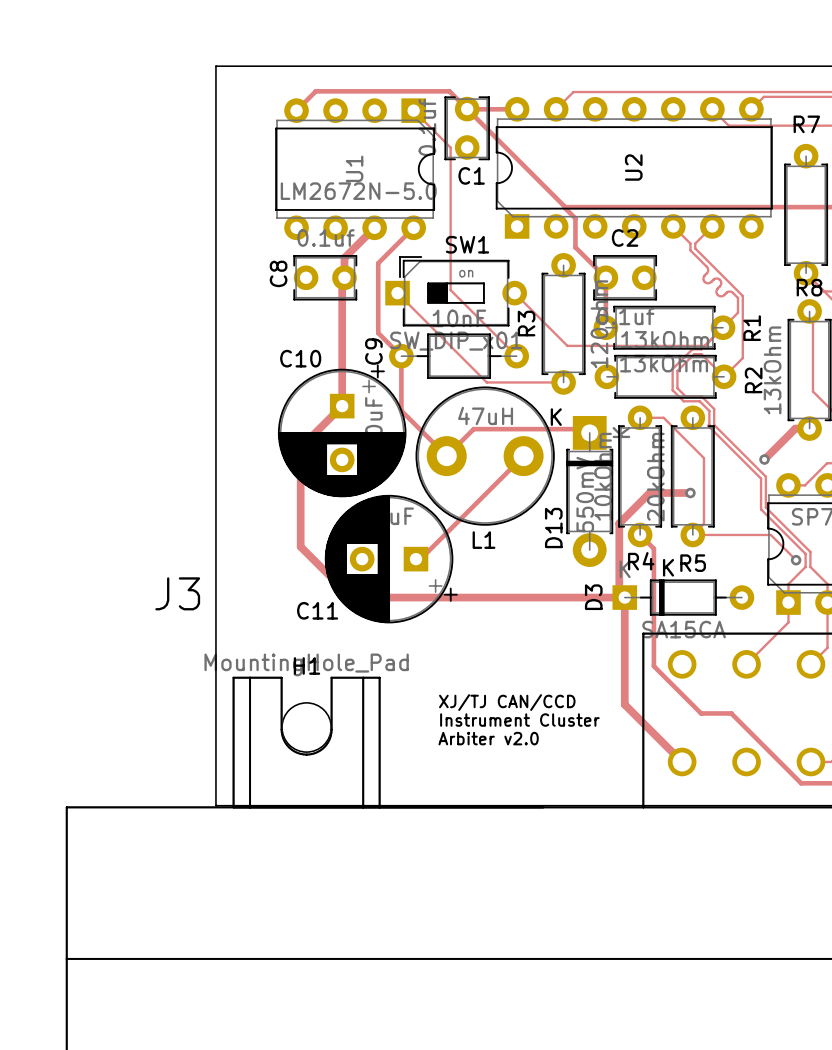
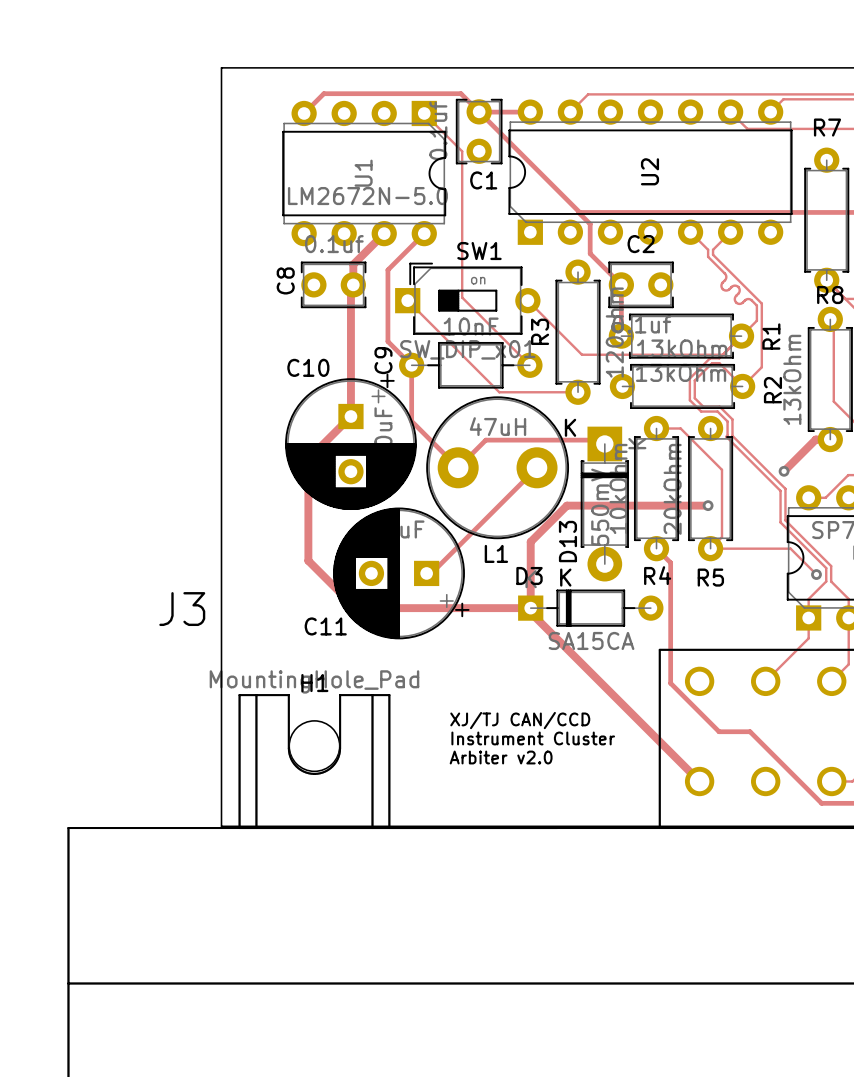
track: (649, 493) (619, 523) (619, 592) -> (666, 505) (566, 505) (530, 541) (530, 608) (355, 608)
D3 text position: K (668, 567) -> K (565, 577)
track: (346, 592) (351, 597) (624, 597) (624, 704) -> (530, 612) (640, 722)
D3 name rotation: 0° (593, 597) -> 90° clockwise (529, 576)
D3 name position: D3 (593, 597) -> D3 (529, 576)
D3 position: (683, 597) -> (590, 608)

